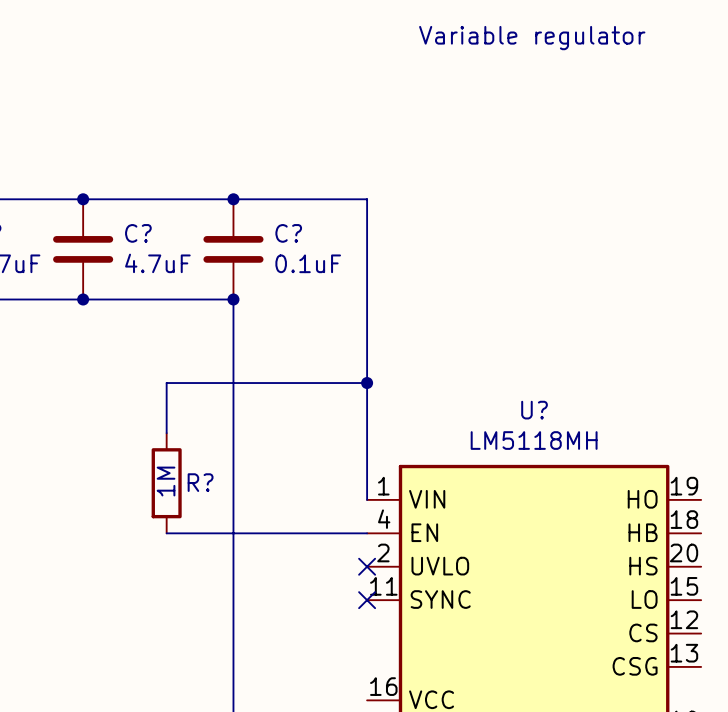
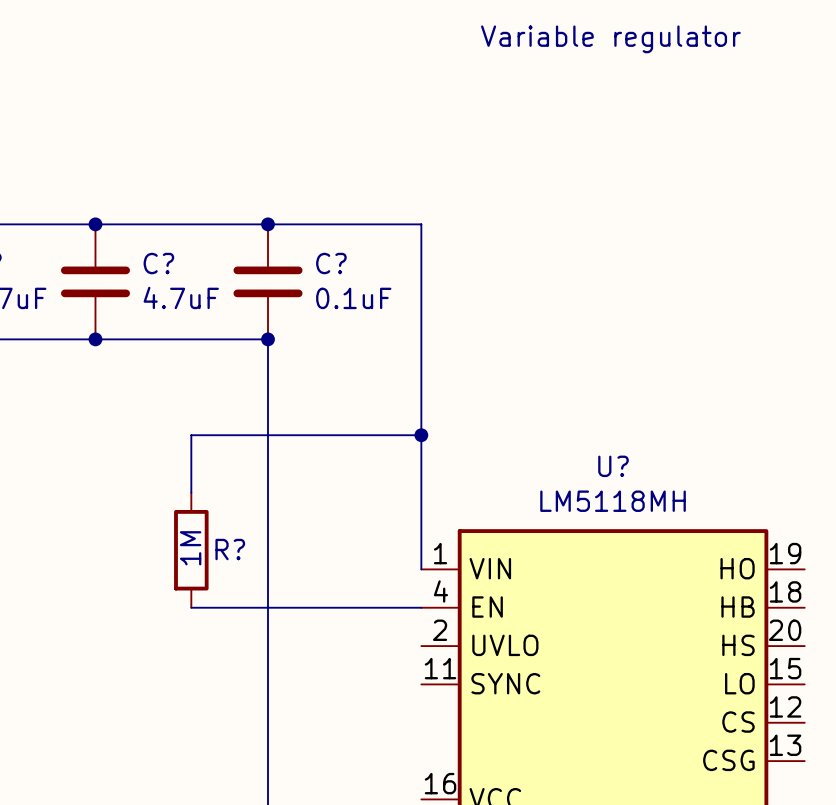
no-connect mark: (367, 566) -> none
no-connect mark: (367, 600) -> none

